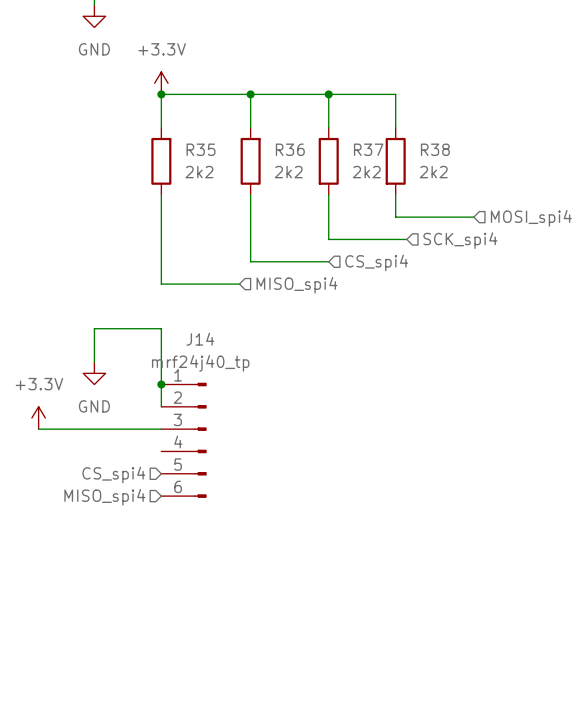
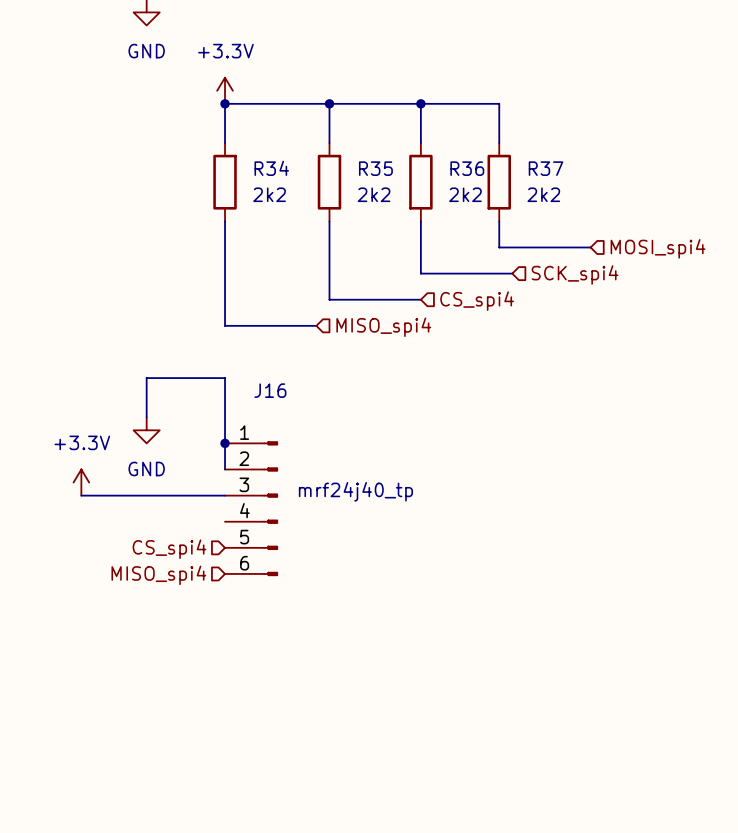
R35 name: R35 (201, 149) -> R34 (271, 168)
R36 name: R36 (290, 149) -> R35 (375, 168)
R37 name: R37 (368, 149) -> R36 (467, 168)
R38 name: R38 (435, 149) -> R37 (546, 168)
J14 name: J14 (200, 339) -> J16 (270, 390)
J14 value position: mrf24j40_tp (200, 363) -> mrf24j40_tp (355, 491)

